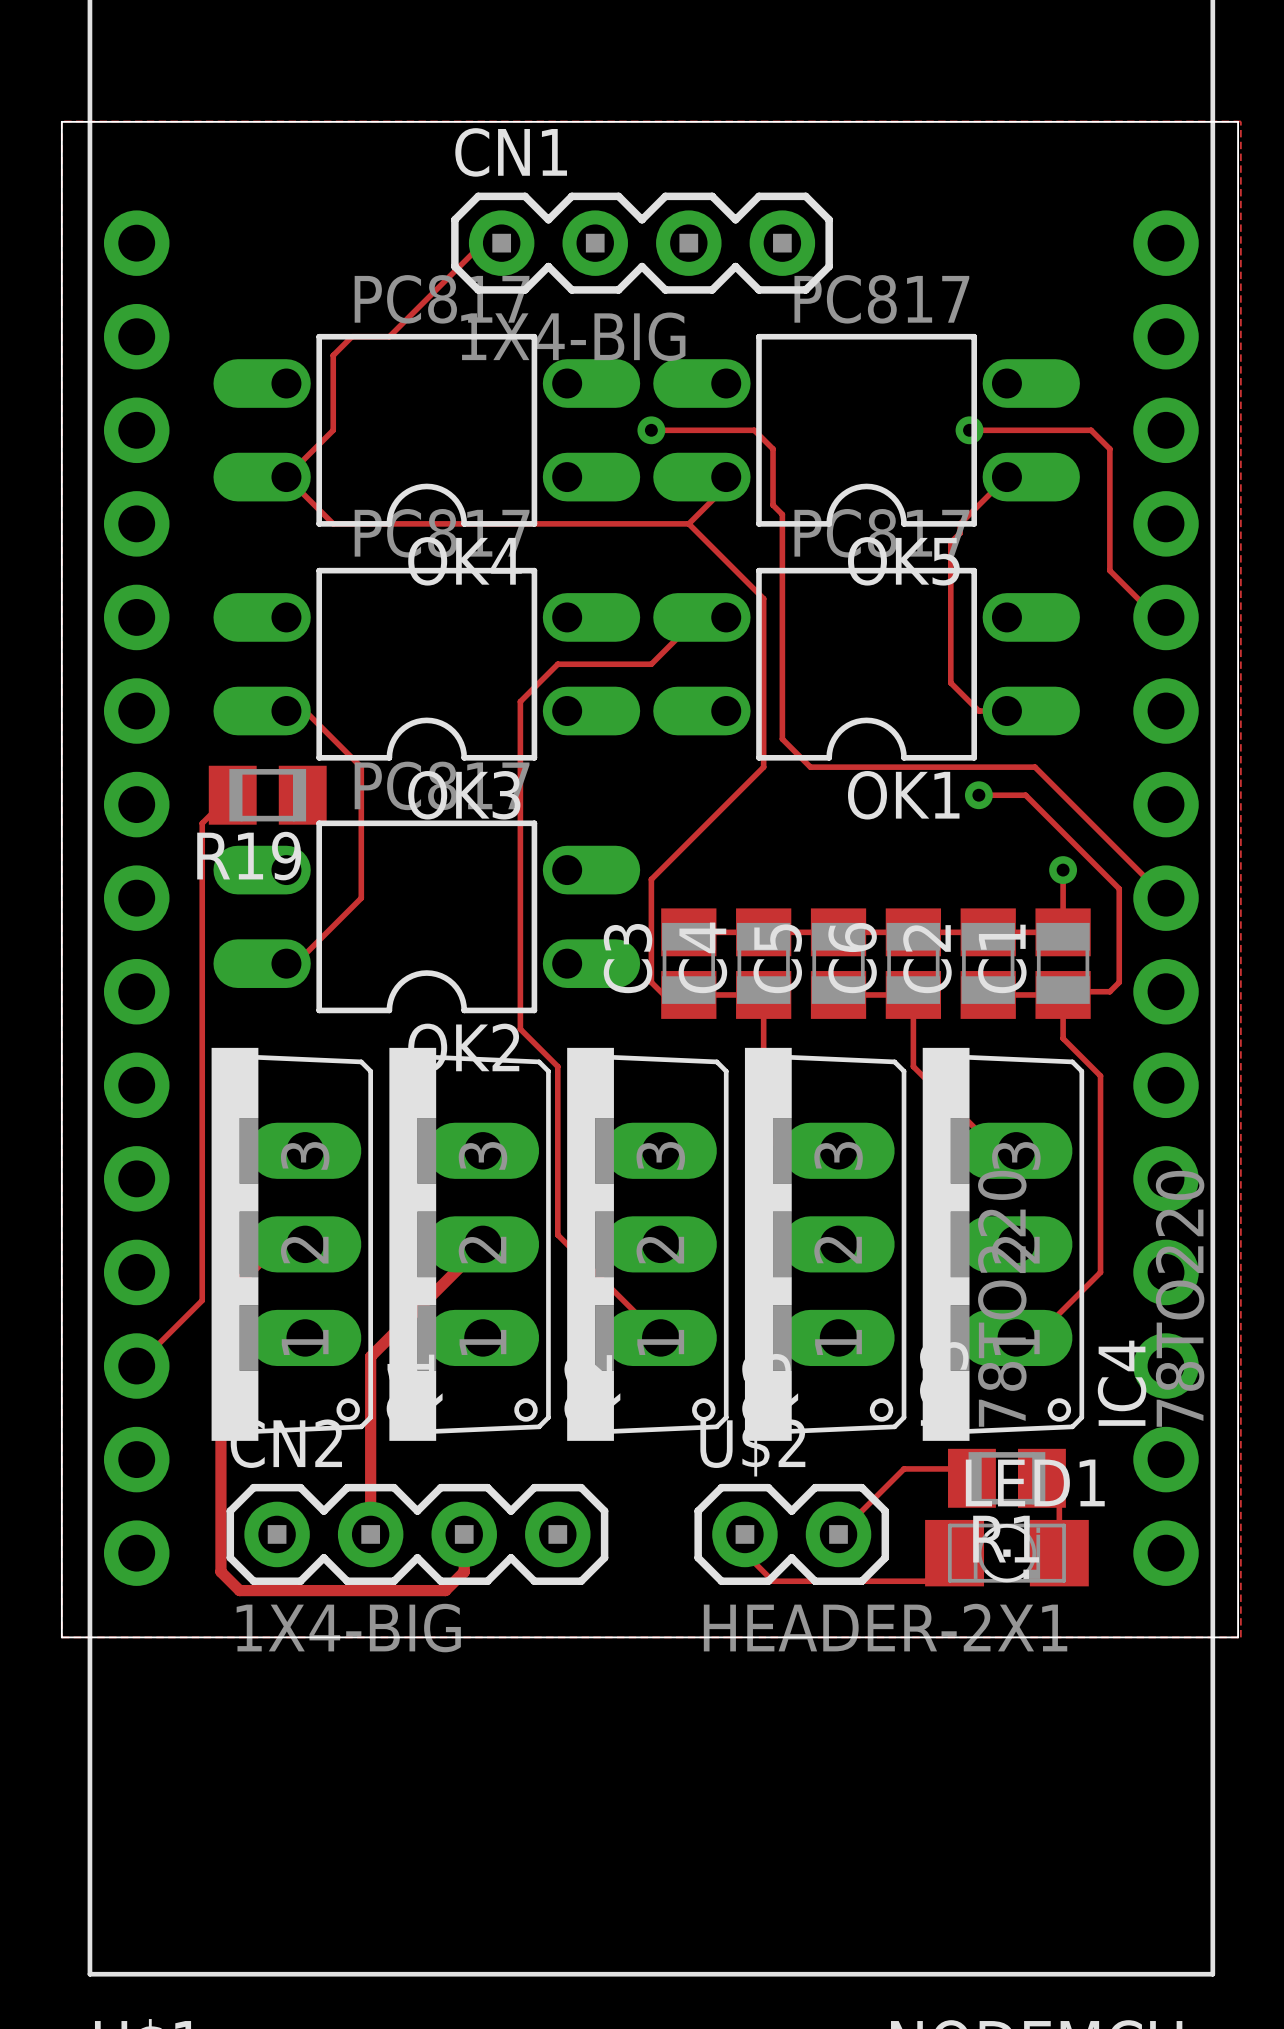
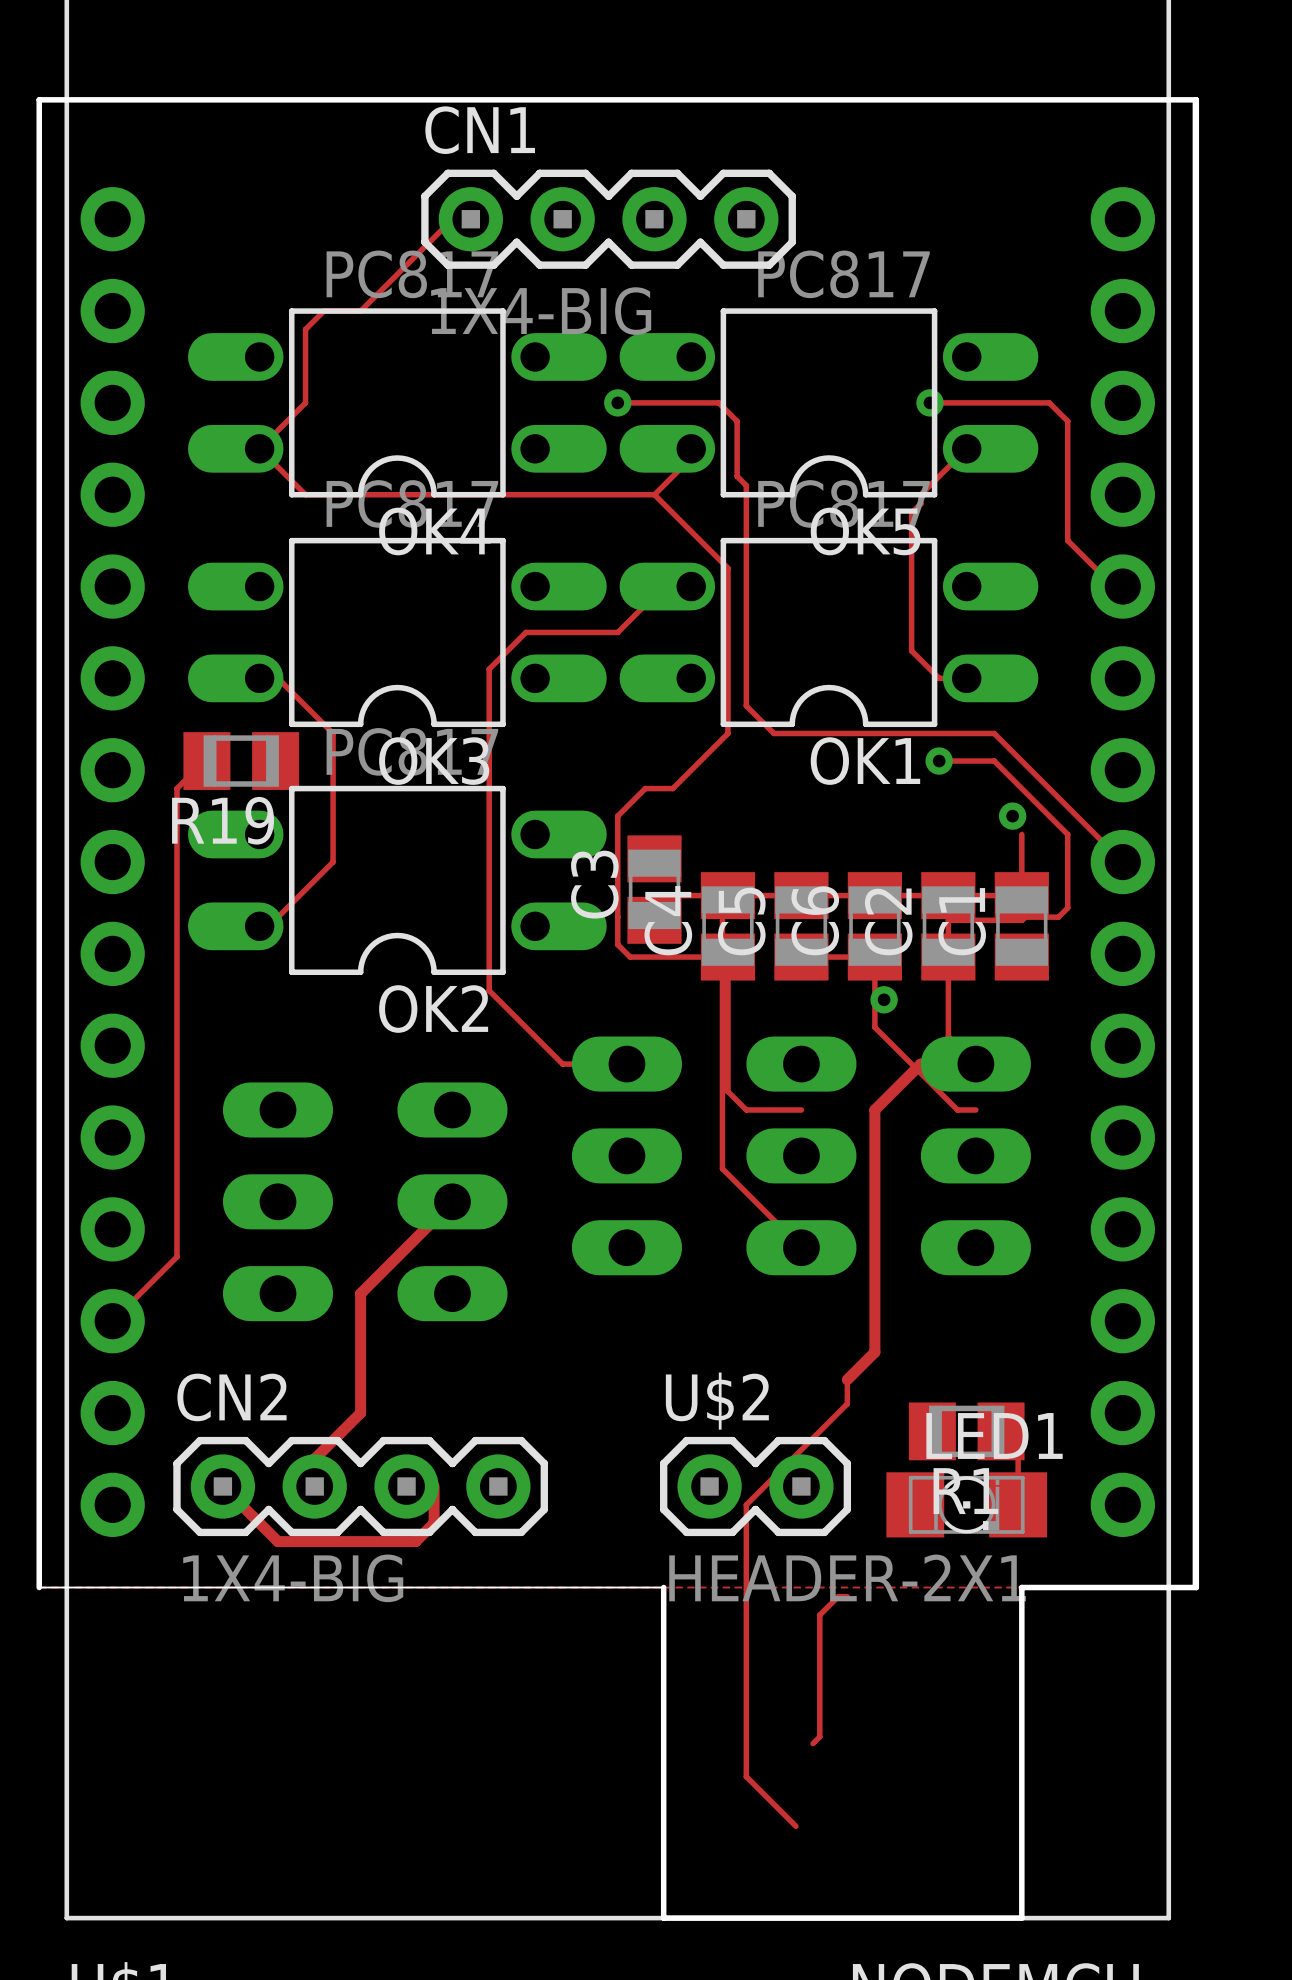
track: (1025, 795) (1119, 888) (1119, 982) (1109, 991) (1066, 991) (1063, 994) (988, 994) -> (985, 761) (994, 761) (1067, 834) (1067, 907) (1058, 917) (1025, 917) (1021, 920) (948, 920) (948, 1036) (975, 1064) (920, 1064) (874, 1109) (874, 1352) (847, 1379) (847, 1403) (746, 1504) (746, 1776) (795, 1826)
track: (707, 823) (651, 879) -> (672, 788) (645, 788) (617, 816) (617, 843)
via position: (1063, 870) -> (1012, 816)
track: none -> (722, 920) (722, 1168) (801, 1247)
C3 position: (688, 963) -> (654, 889)
track: (1059, 994) (1063, 998) (1063, 1038) (1100, 1075) (1100, 1272) (1035, 1337) (1016, 1337) -> none
via: none -> (884, 999)
track: (557, 1066) (557, 1235) (660, 1337) -> (525, 1027) (562, 1064) (626, 1064)
part side: top (292, 1244) -> bottom (277, 1201)
track: (305, 1244) (277, 1244) (220, 1300) (220, 1571) (239, 1590) (305, 1590) -> (222, 1486) (277, 1541)
part side: top (470, 1244) -> bottom (452, 1201)
part side: top (647, 1244) -> bottom (626, 1155)
part side: top (825, 1244) -> bottom (801, 1155)
IC4 side: top (1003, 1244) -> bottom (975, 1155)
track: (389, 1337) (370, 1356) (370, 1534) -> (360, 1293) (360, 1413) (314, 1458) (314, 1486)
track: (971, 1478) (962, 1468) (904, 1468) (838, 1534) -> none
CN2 position: (417, 1534) -> (360, 1486)
track: (744, 1534) (744, 1553) (773, 1581) (926, 1581) (954, 1553) -> none
board edge: (698, 1637) (1063, 1637) -> (663, 1587) (663, 1918) (1021, 1918) (1021, 1587) (1196, 1587) (1196, 99) (39, 99) (39, 1587)
track: none -> (847, 1596) (838, 1596) (819, 1615) (819, 1736) (813, 1743)

